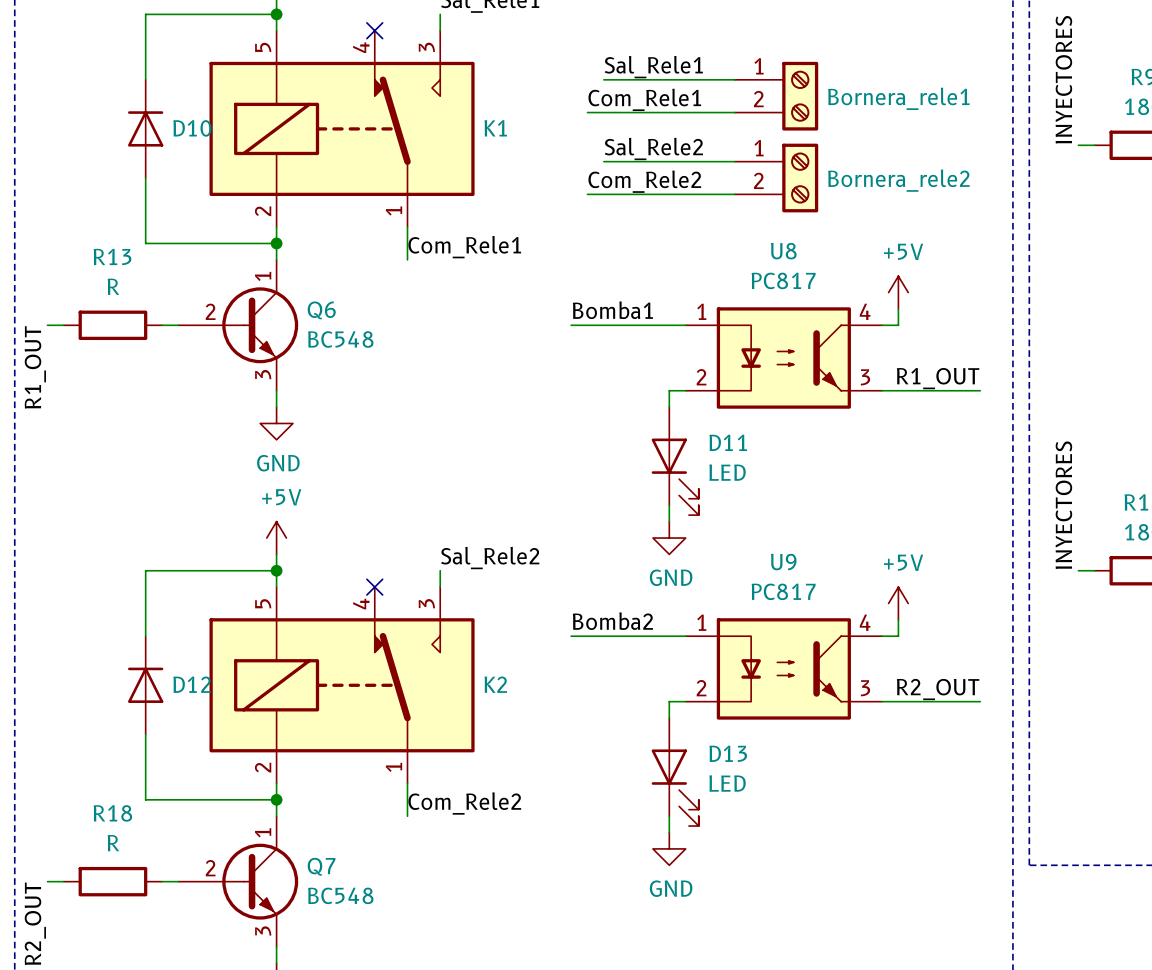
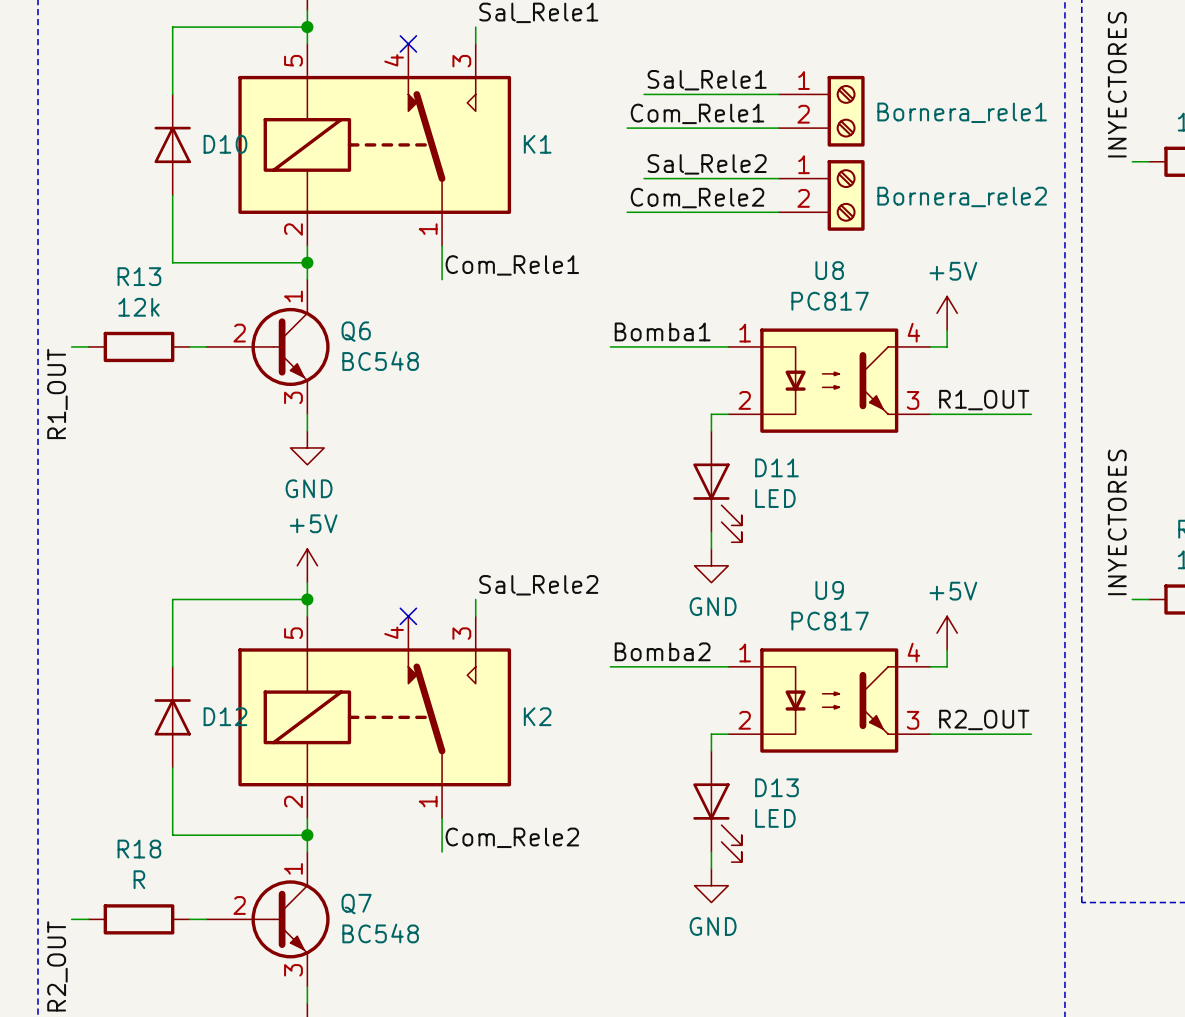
R13 value: R (113, 286) -> 12k (139, 307)

